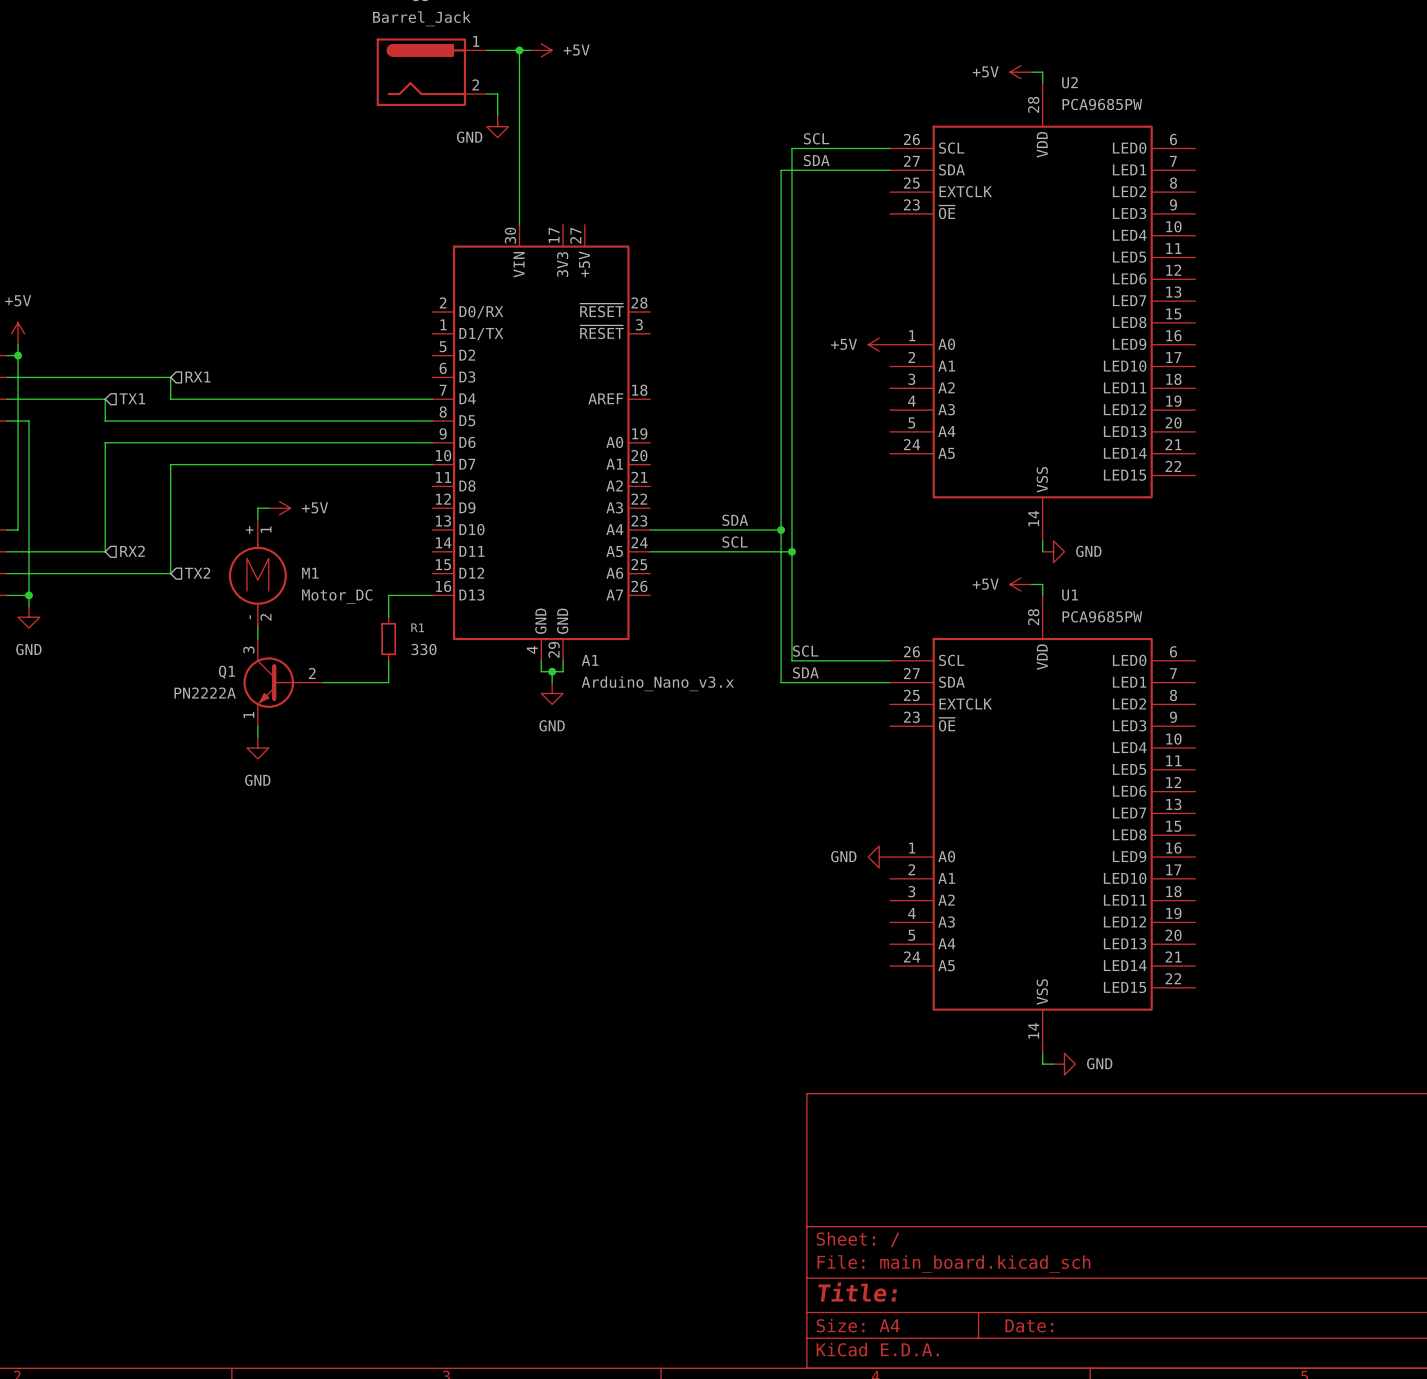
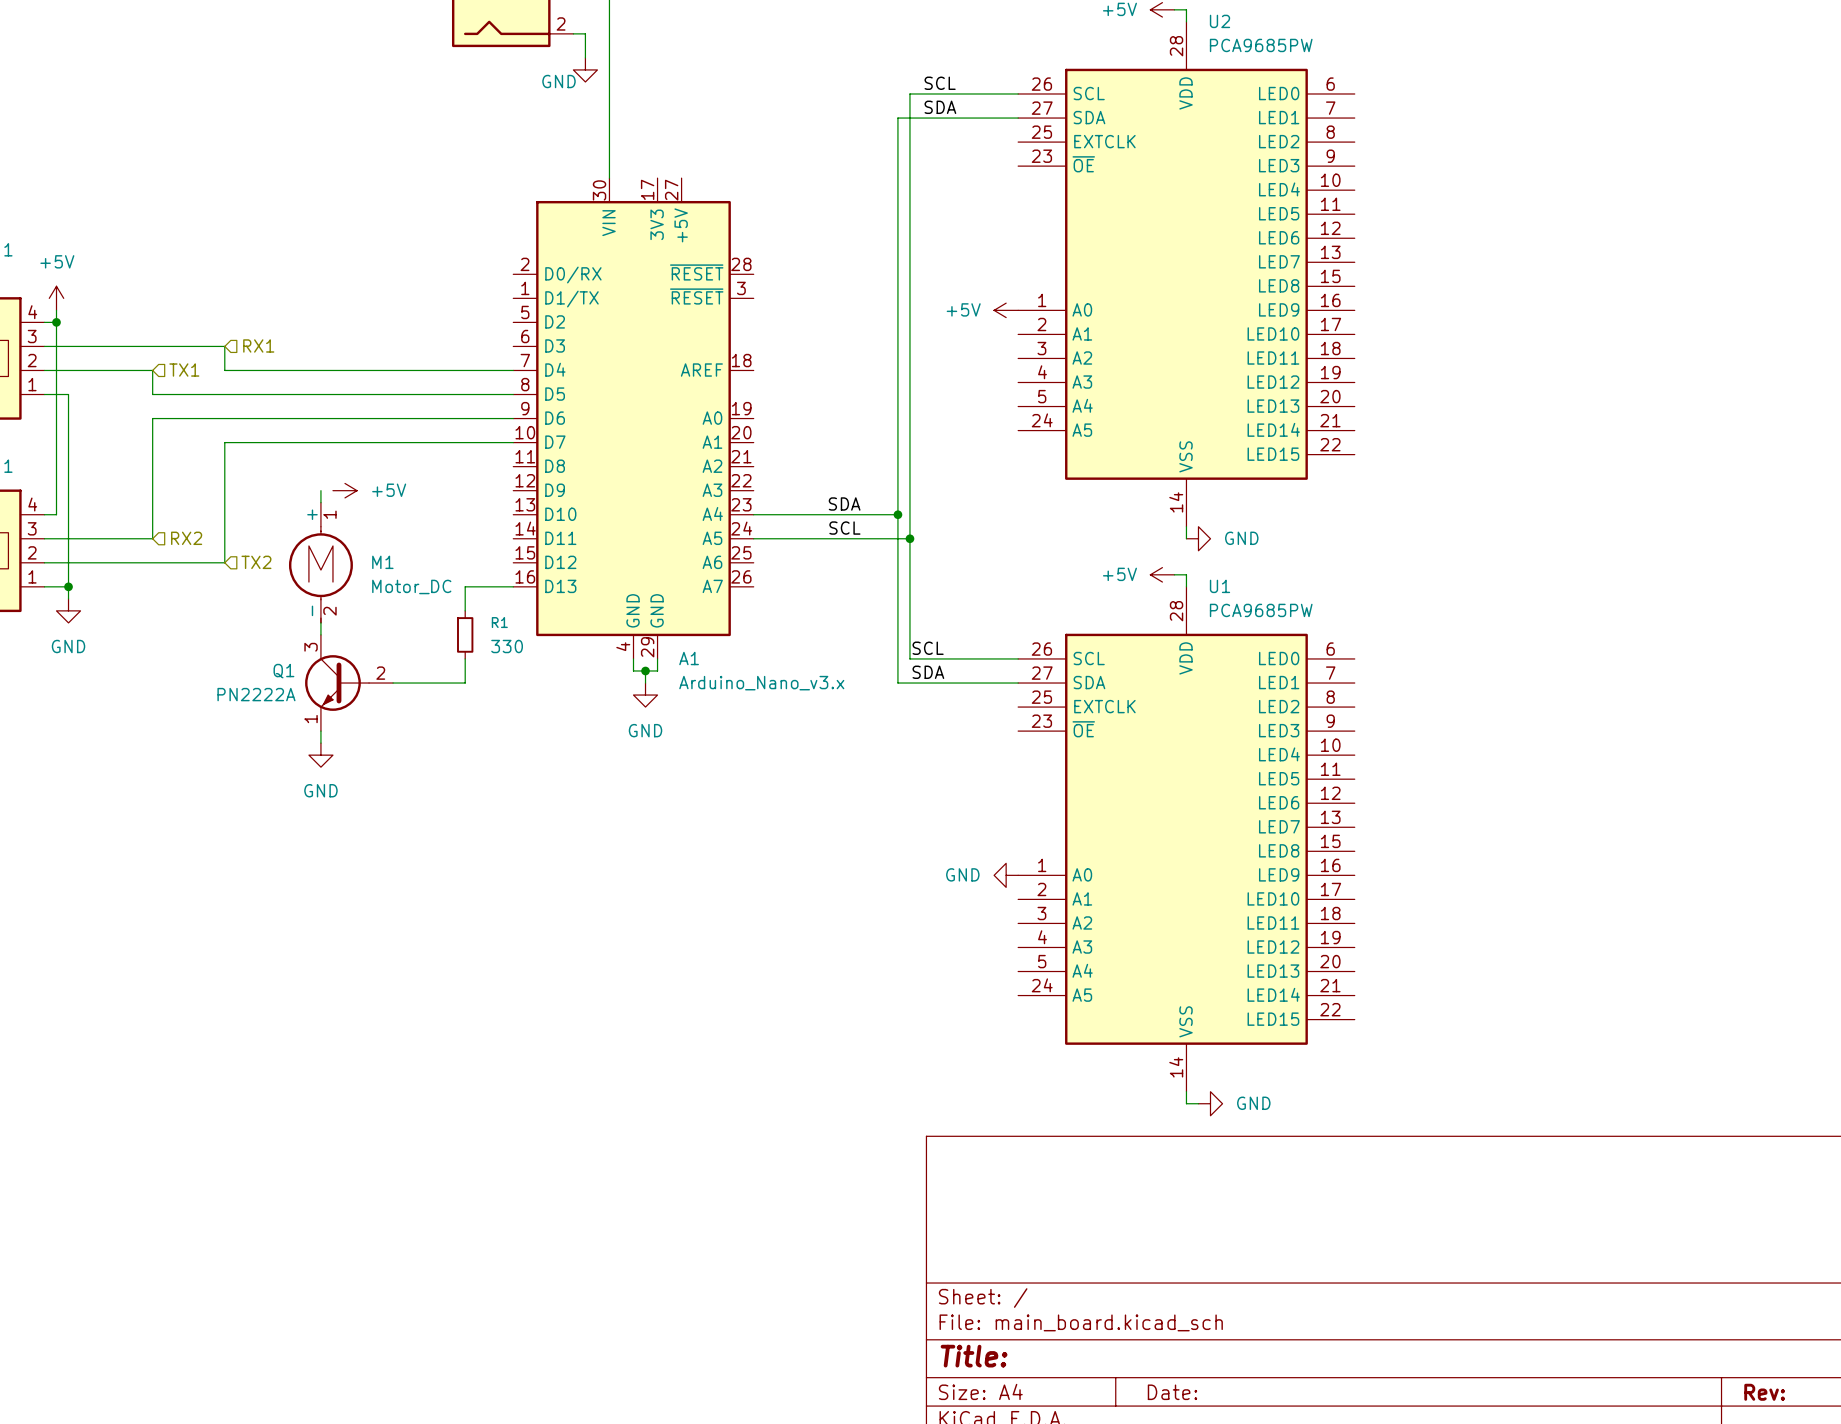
wire: (257, 508) (268, 508) -> none

